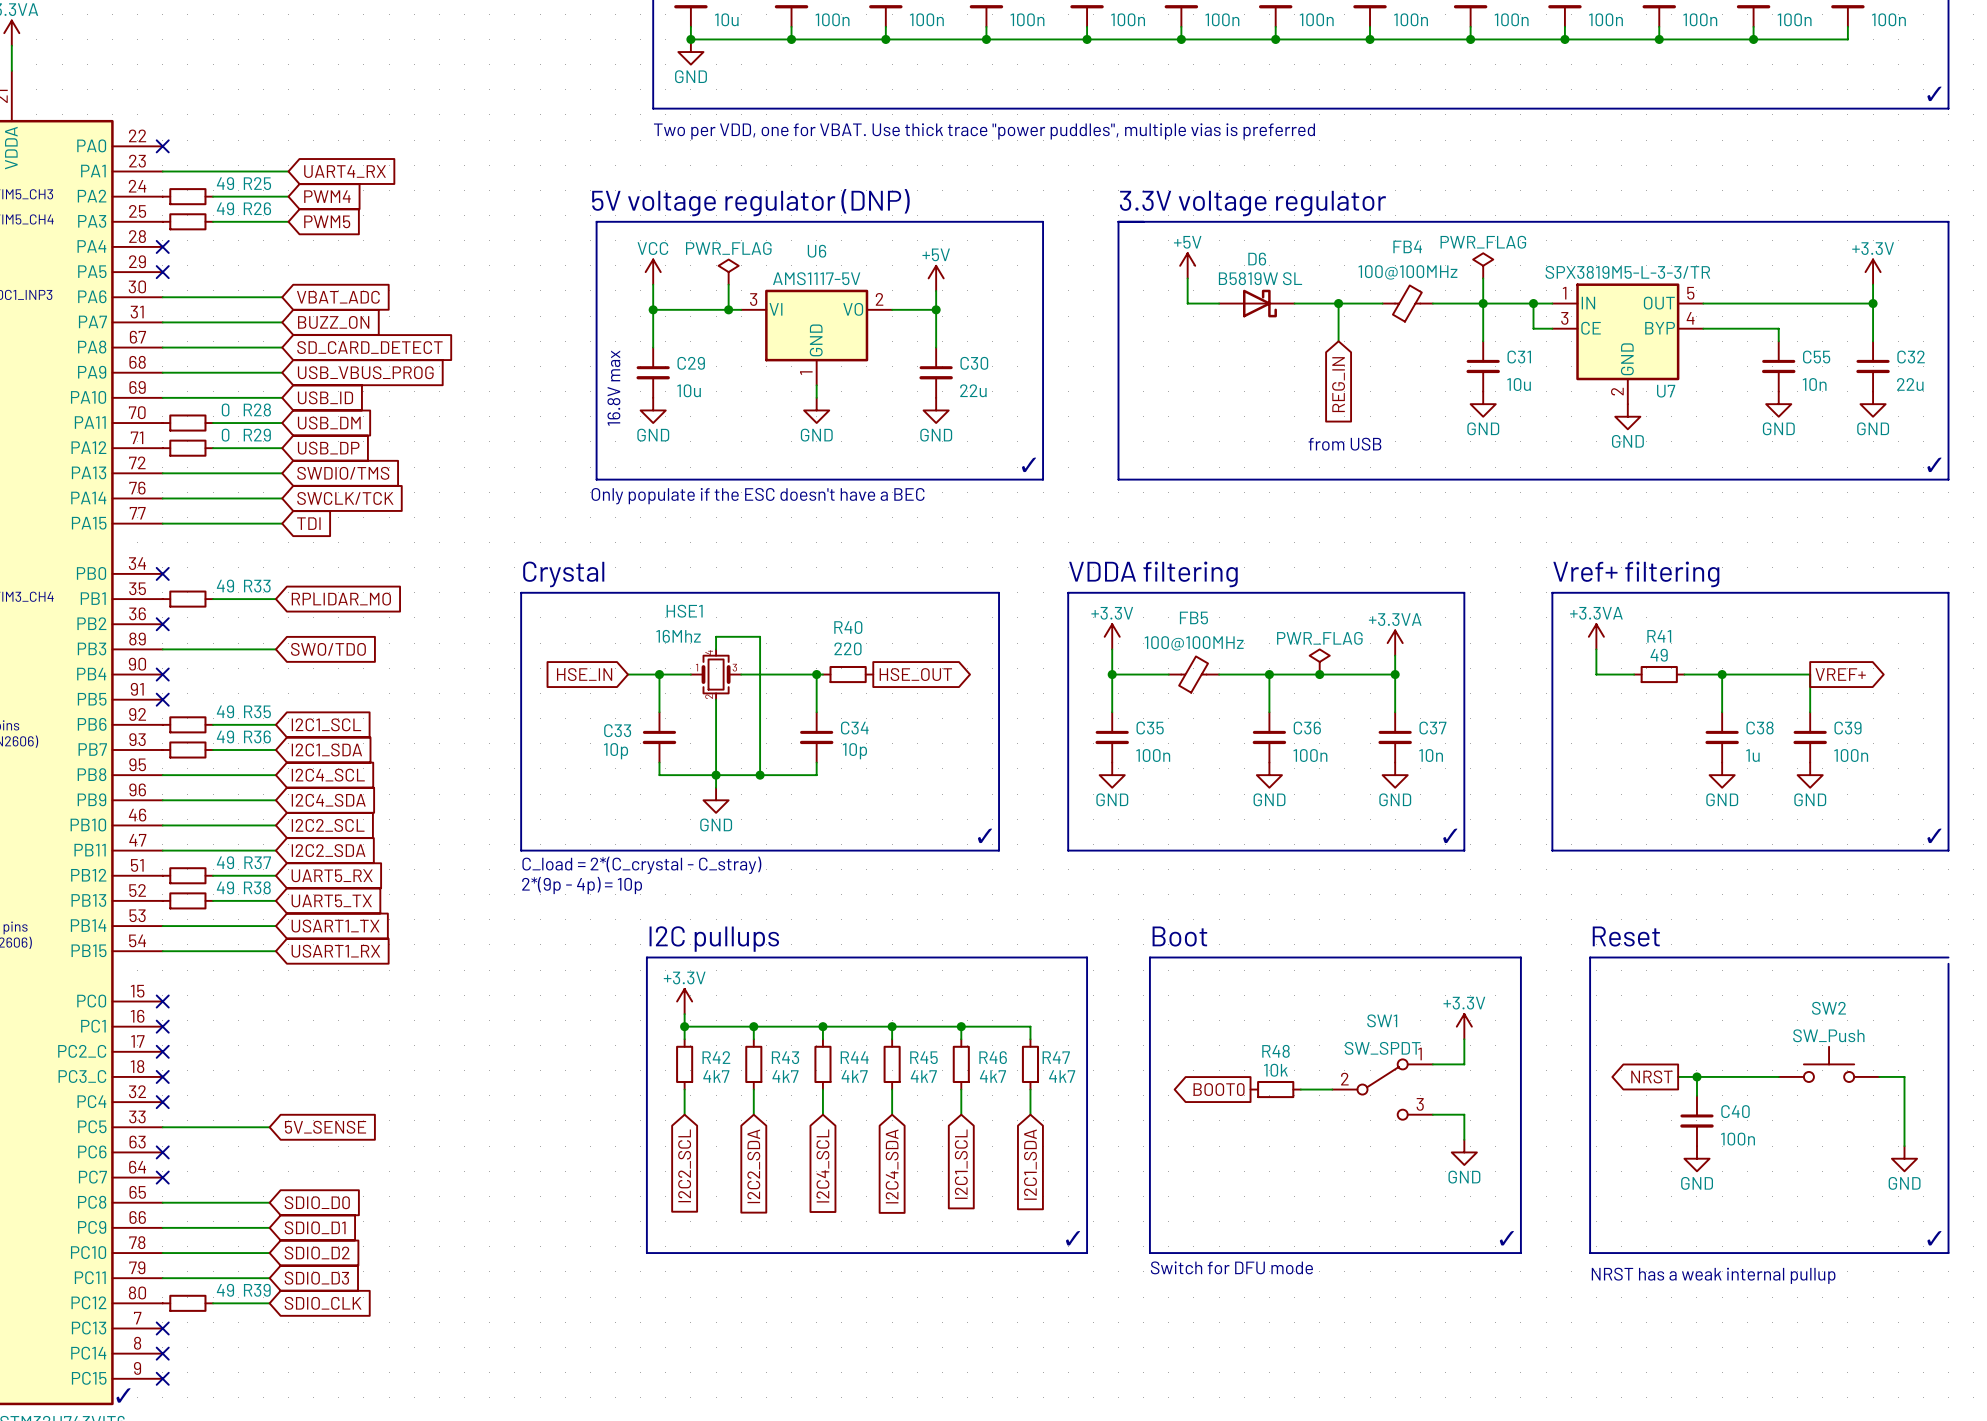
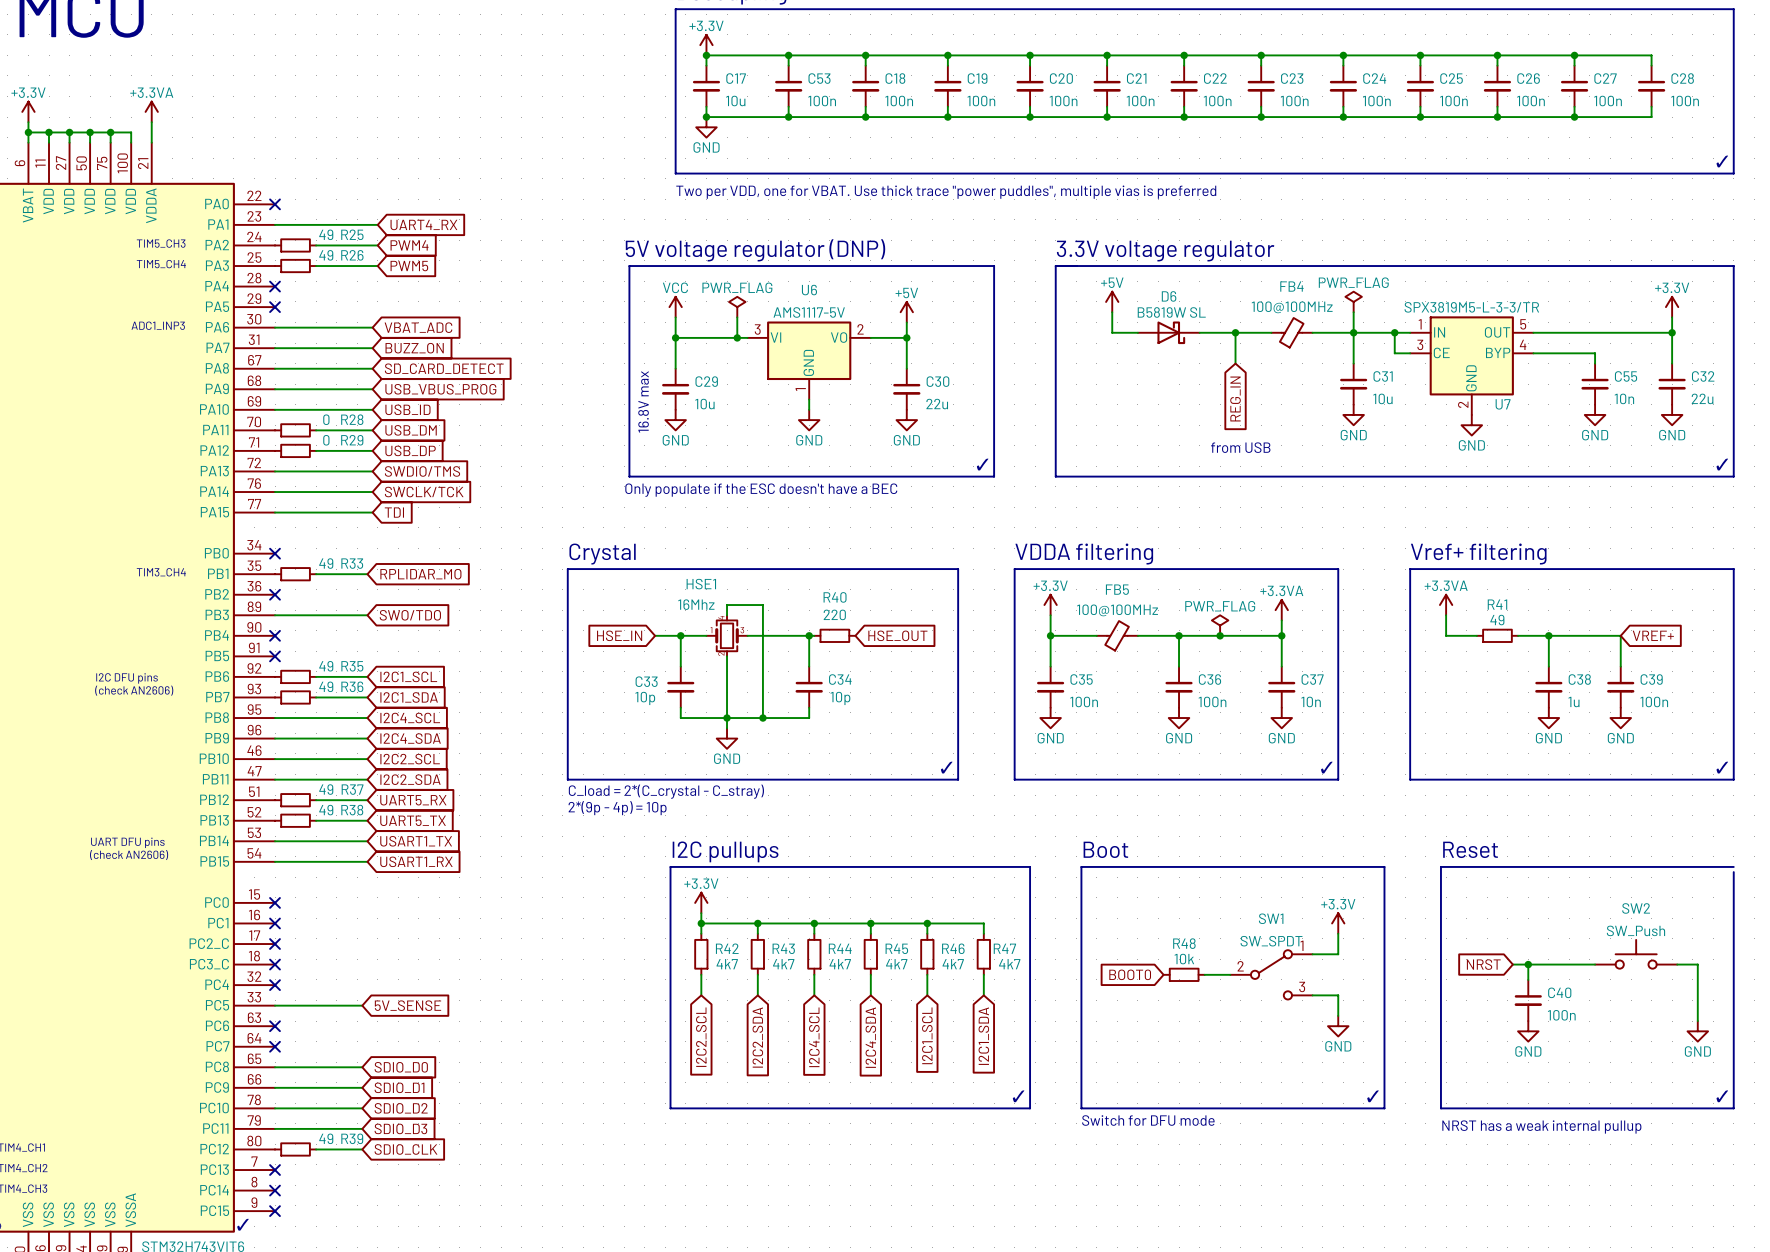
global label shape: output (915, 674) -> input (897, 635)
global label shape: output (1840, 674) -> input (1653, 635)
global label shape: output (1651, 1076) -> input (1483, 964)
global label shape: output (1219, 1089) -> input (1130, 974)

